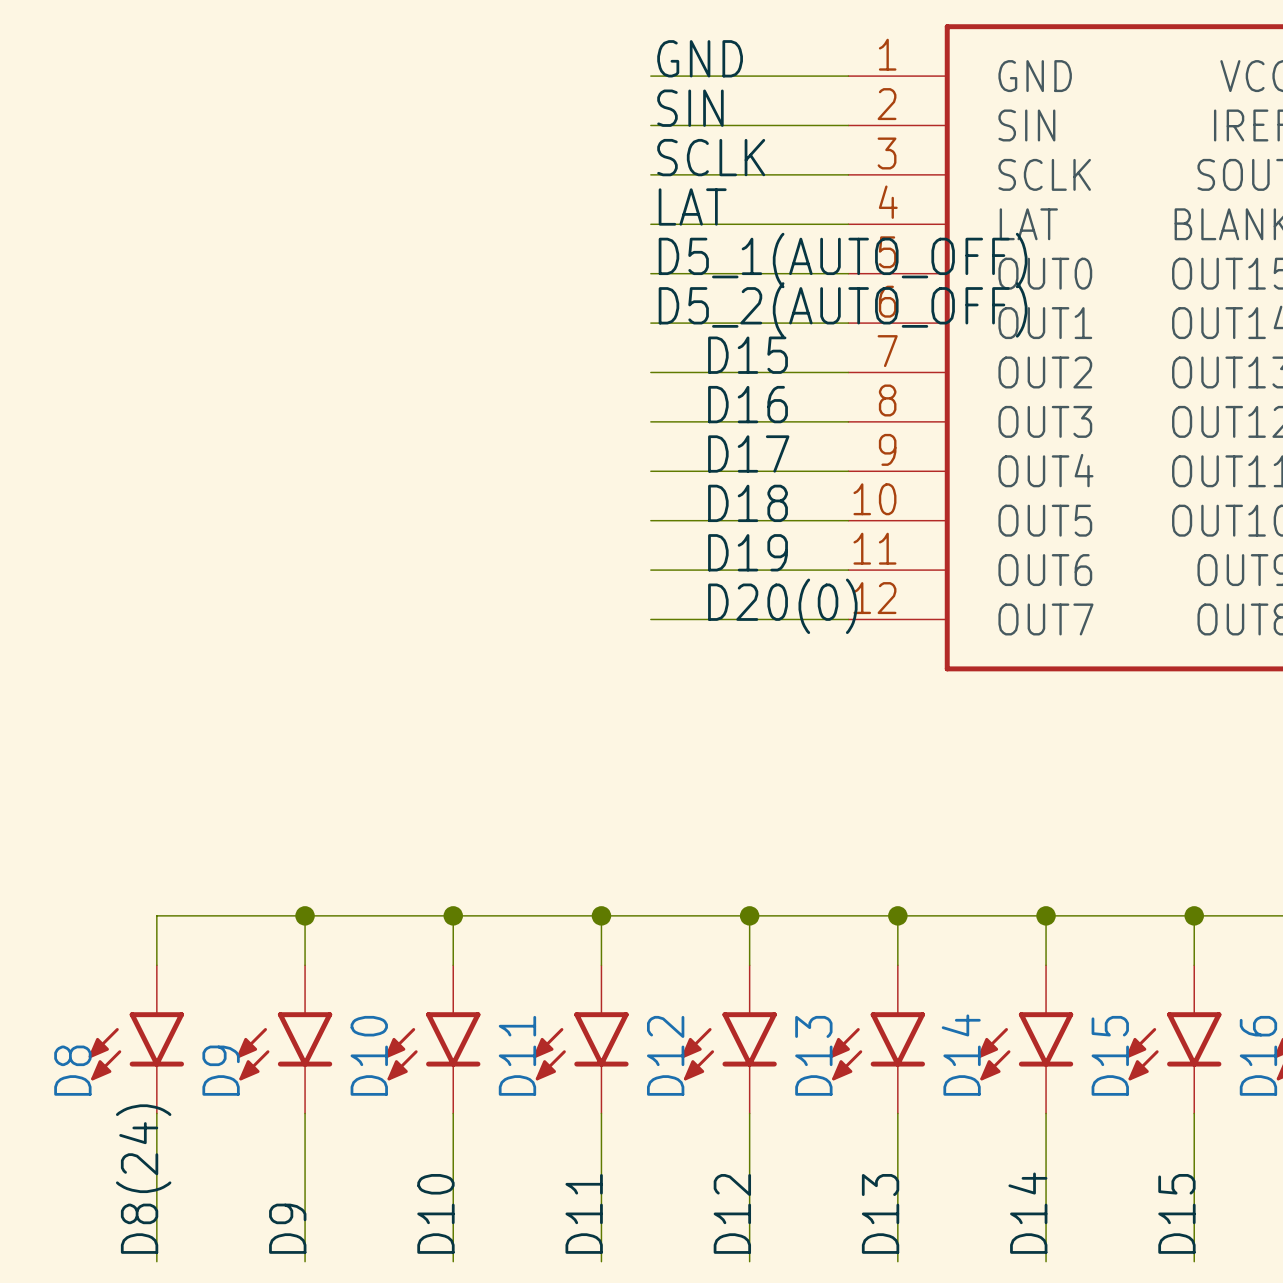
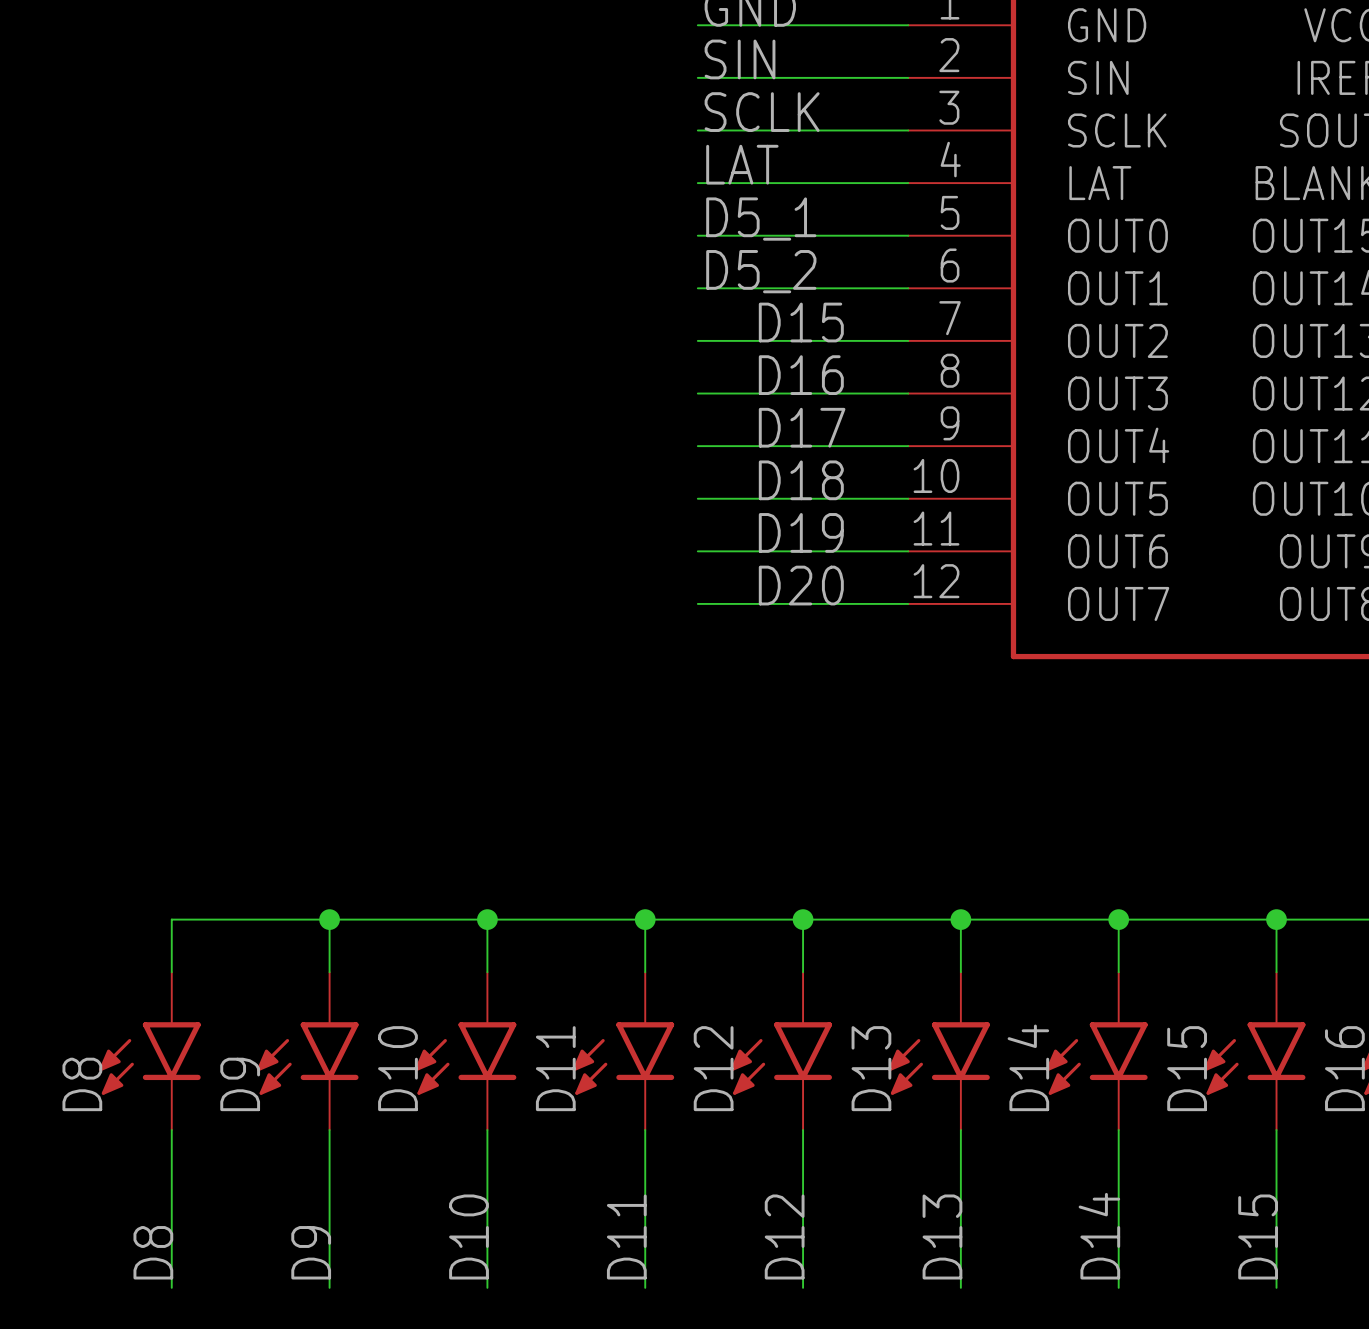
label: D5_1(AUTO_OFF) (843, 260) -> D5_1 (761, 219)
label: D5_2(AUTO_OFF) (843, 309) -> D5_2 (761, 271)
label: D20(0) (782, 606) -> D20 (801, 585)
label: D8(24) (143, 1179) -> D8 (153, 1252)

